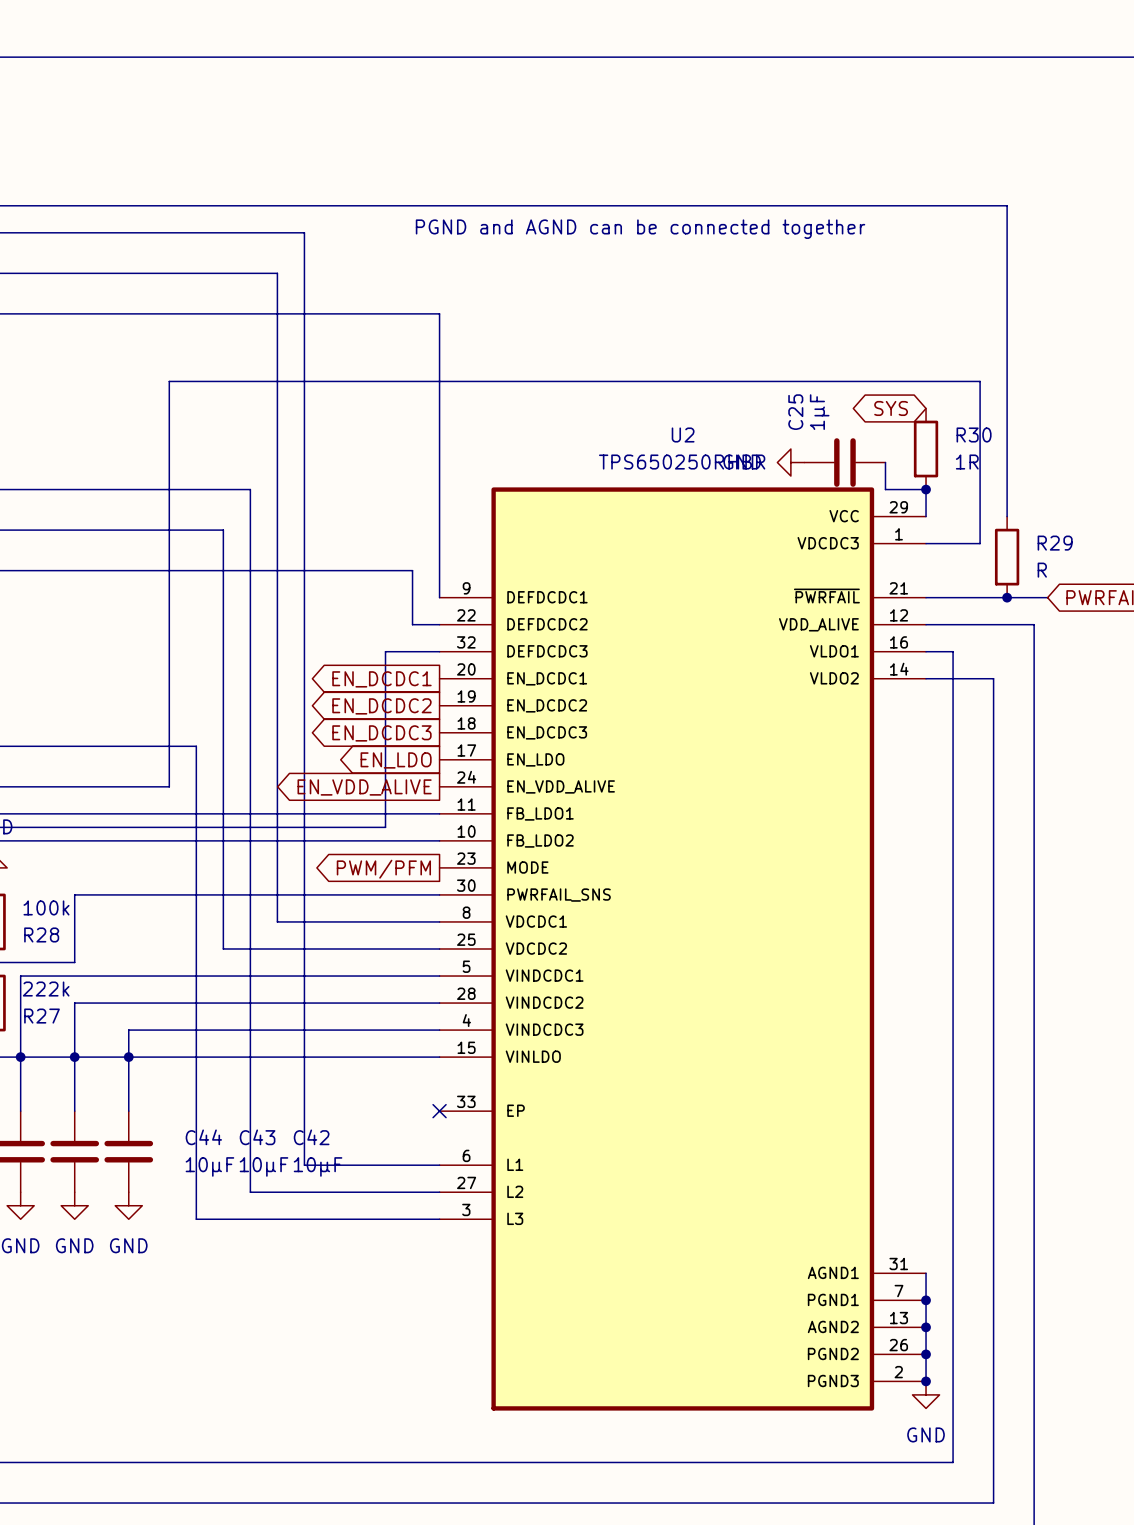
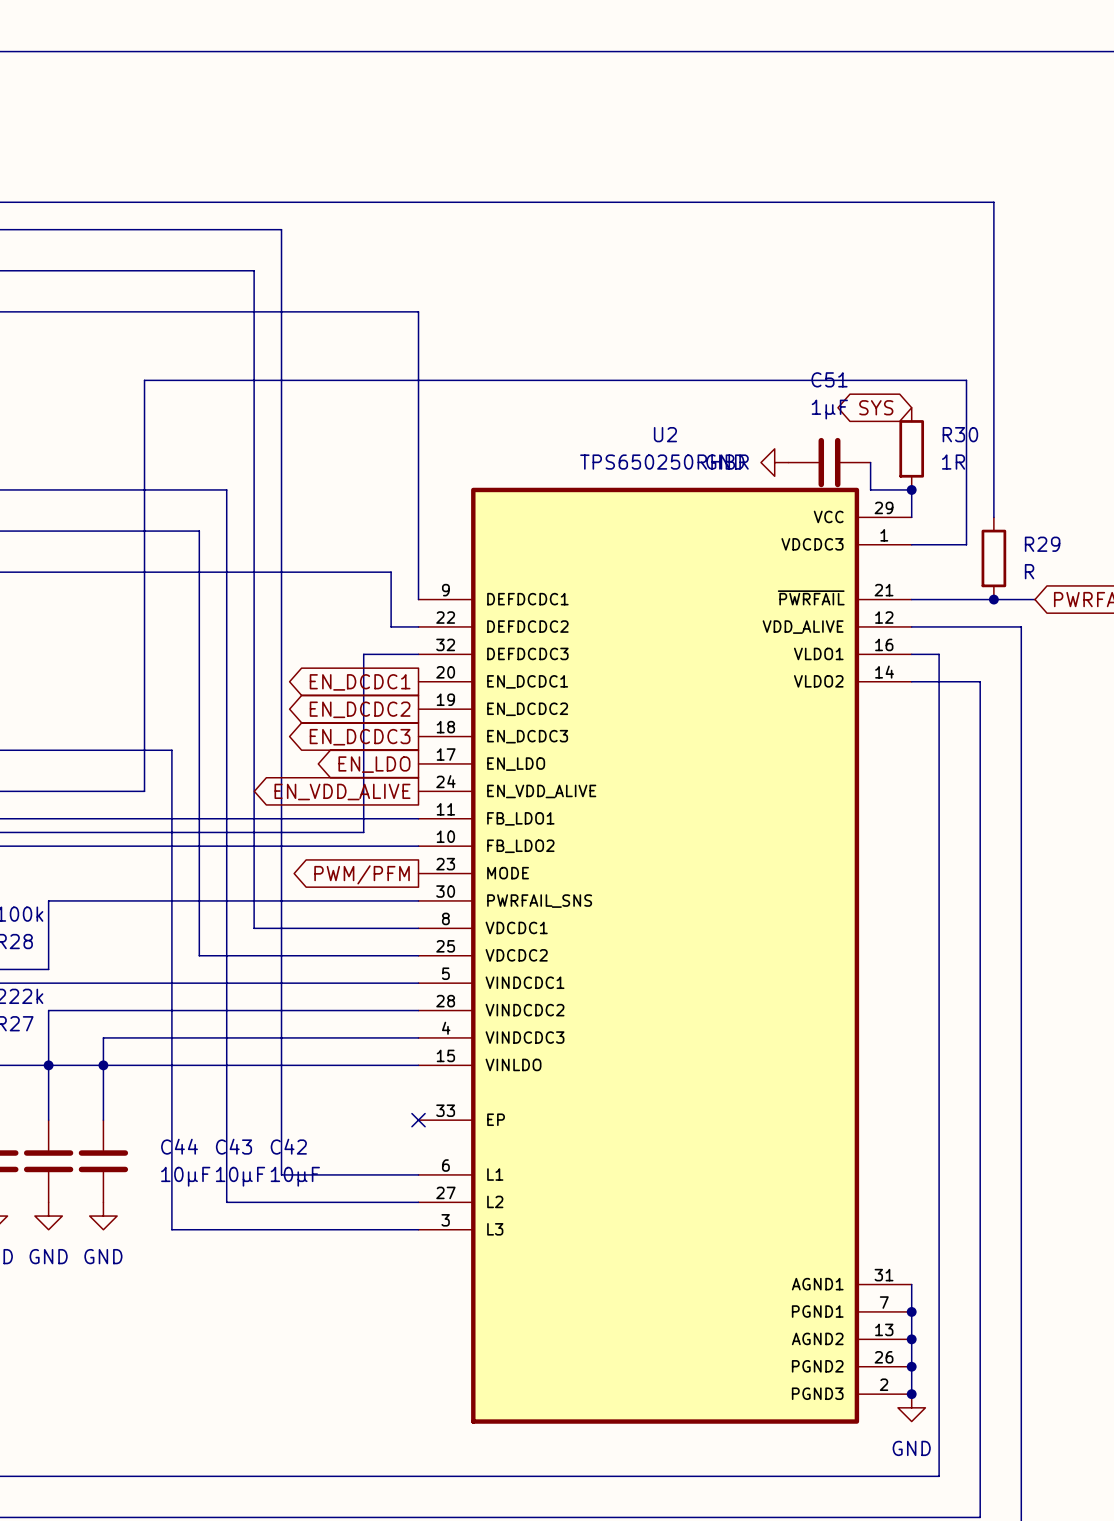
text: PGND and AGND can be connected together (640, 229) -> none
C25 name: C25 (795, 412) -> C51 (829, 379)
C25 value rotation: 0° (819, 412) -> 90° clockwise (829, 409)

